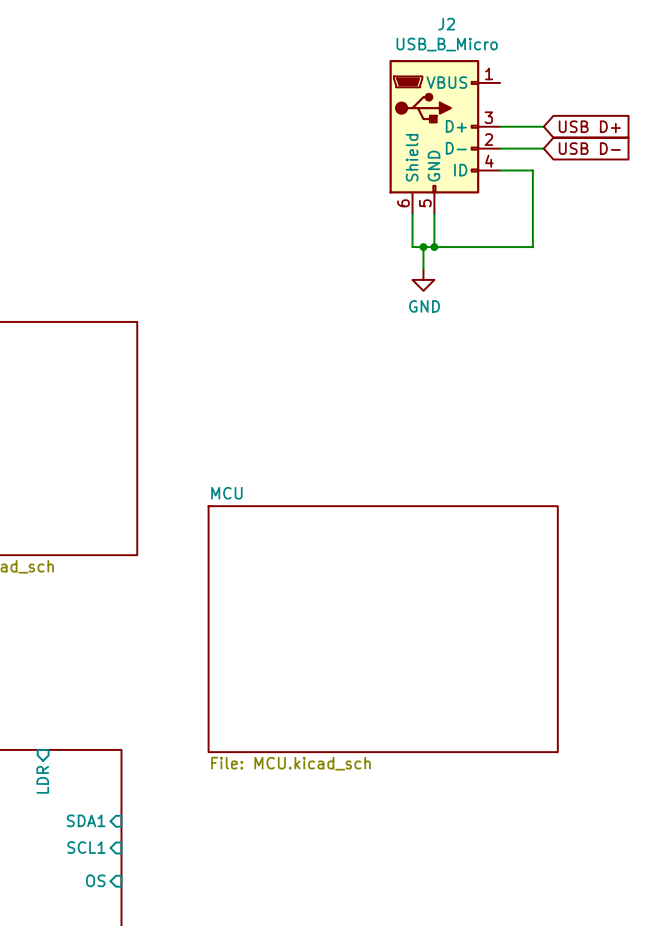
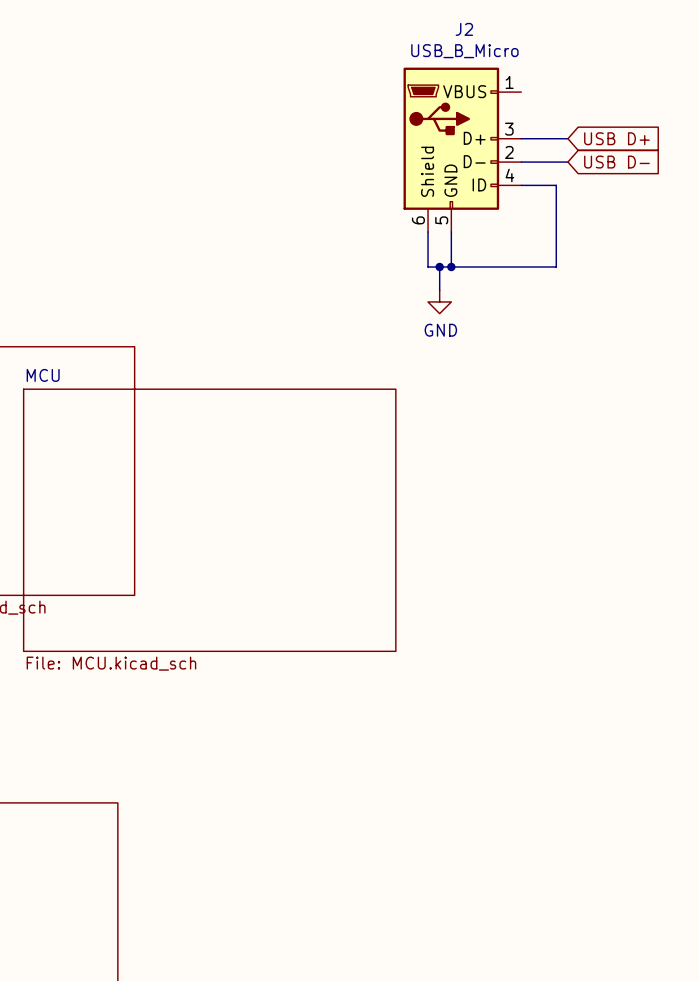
sheet MCU: none -> File: MCU.kicad_sch (209, 520)
sheet MCU: File: MCU.kicad_sch (383, 629) -> none
sheet pin: LDR (42, 779) -> none
sheet pin: SDA1 (86, 820) -> none
sheet pin: SCL1 (86, 847) -> none
sheet pin: OS (95, 880) -> none

